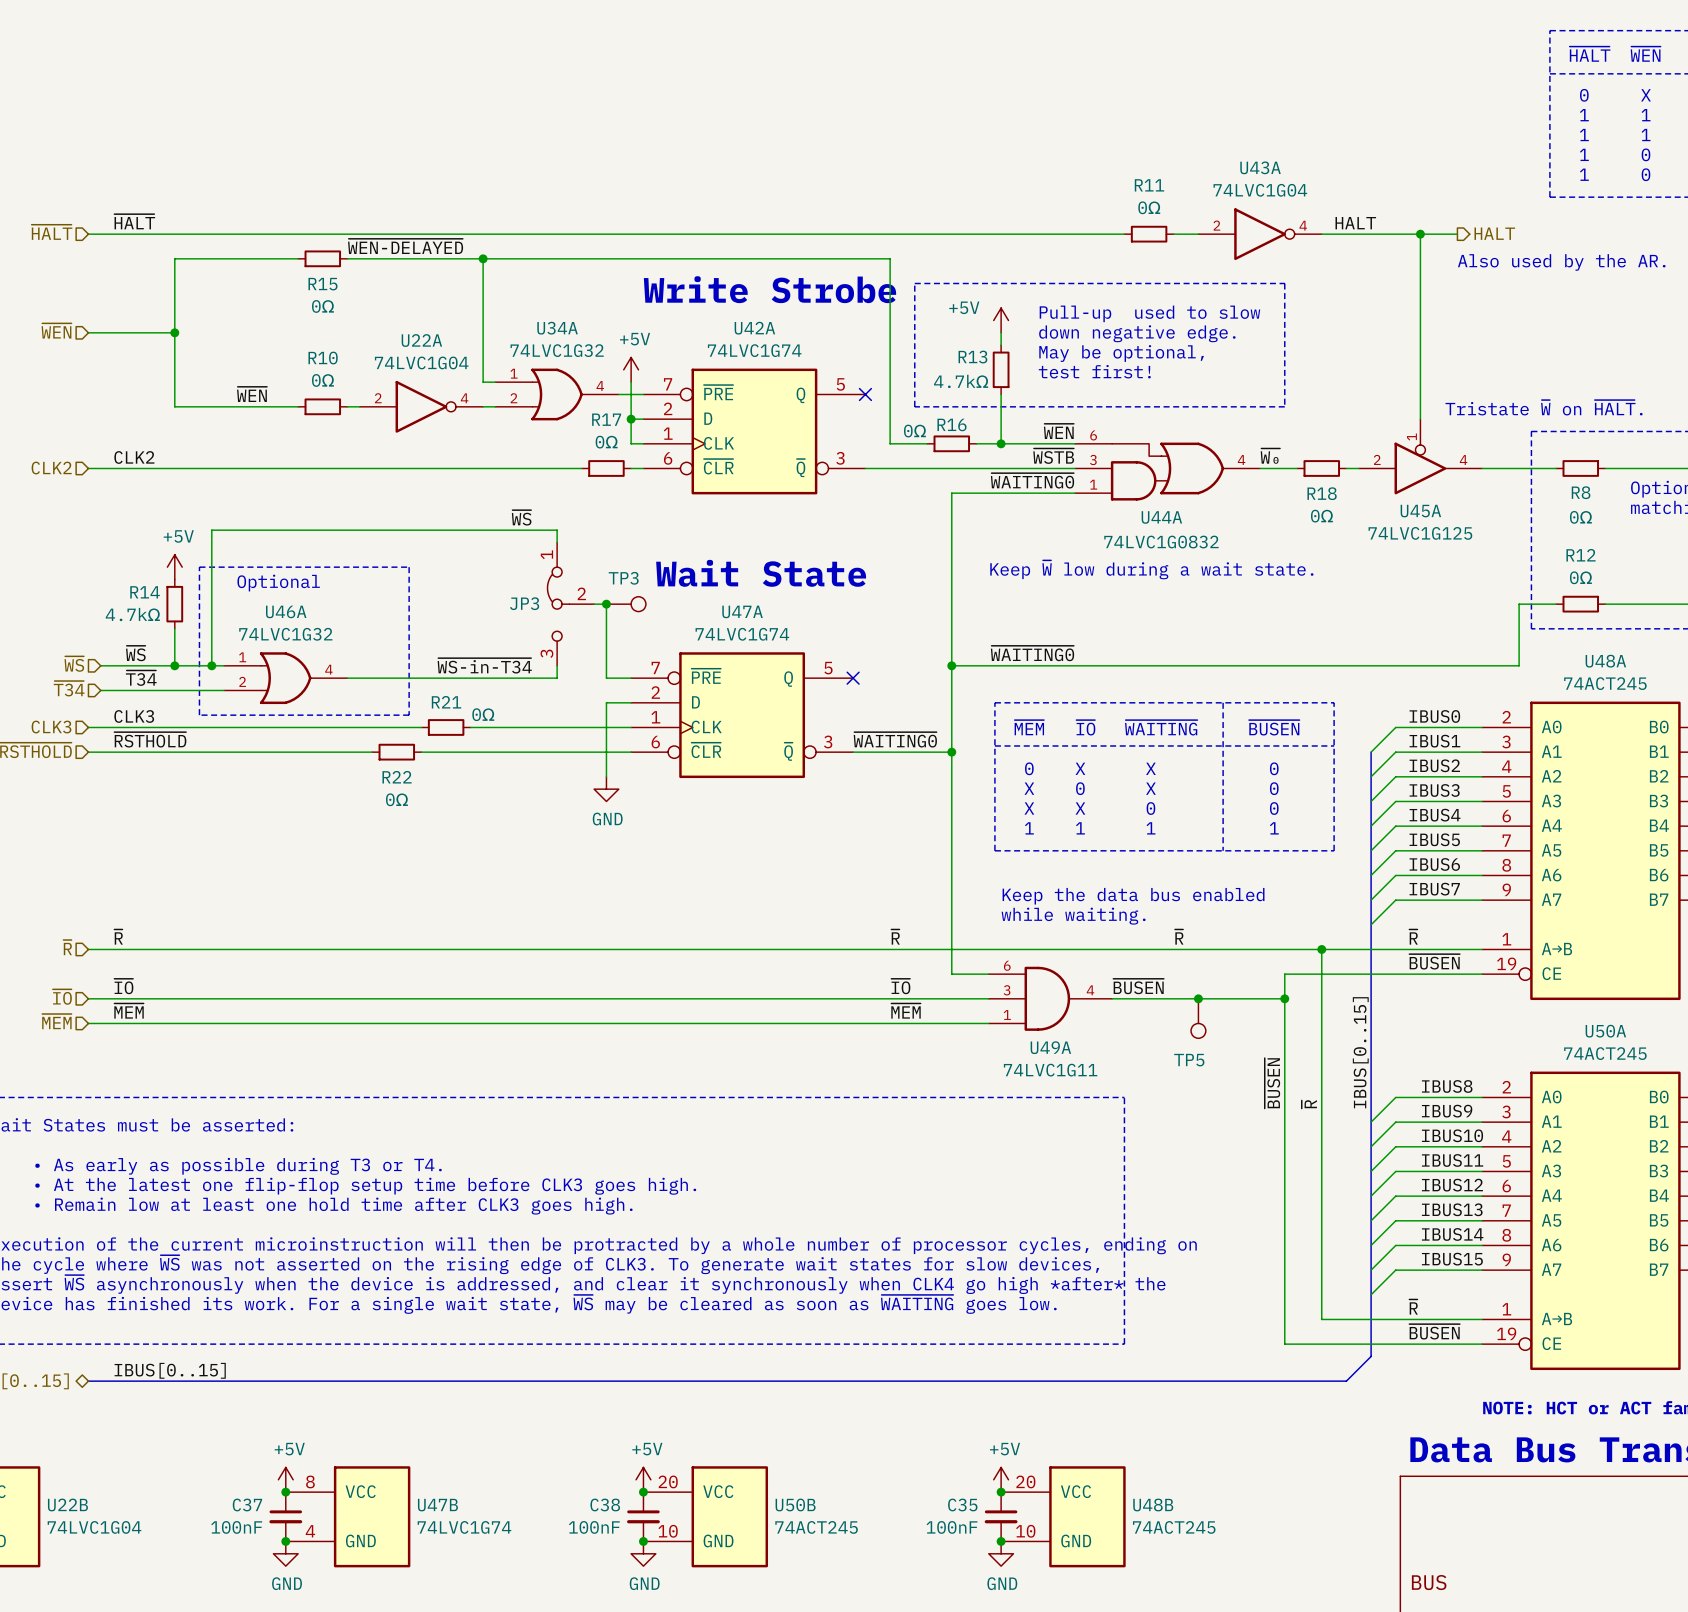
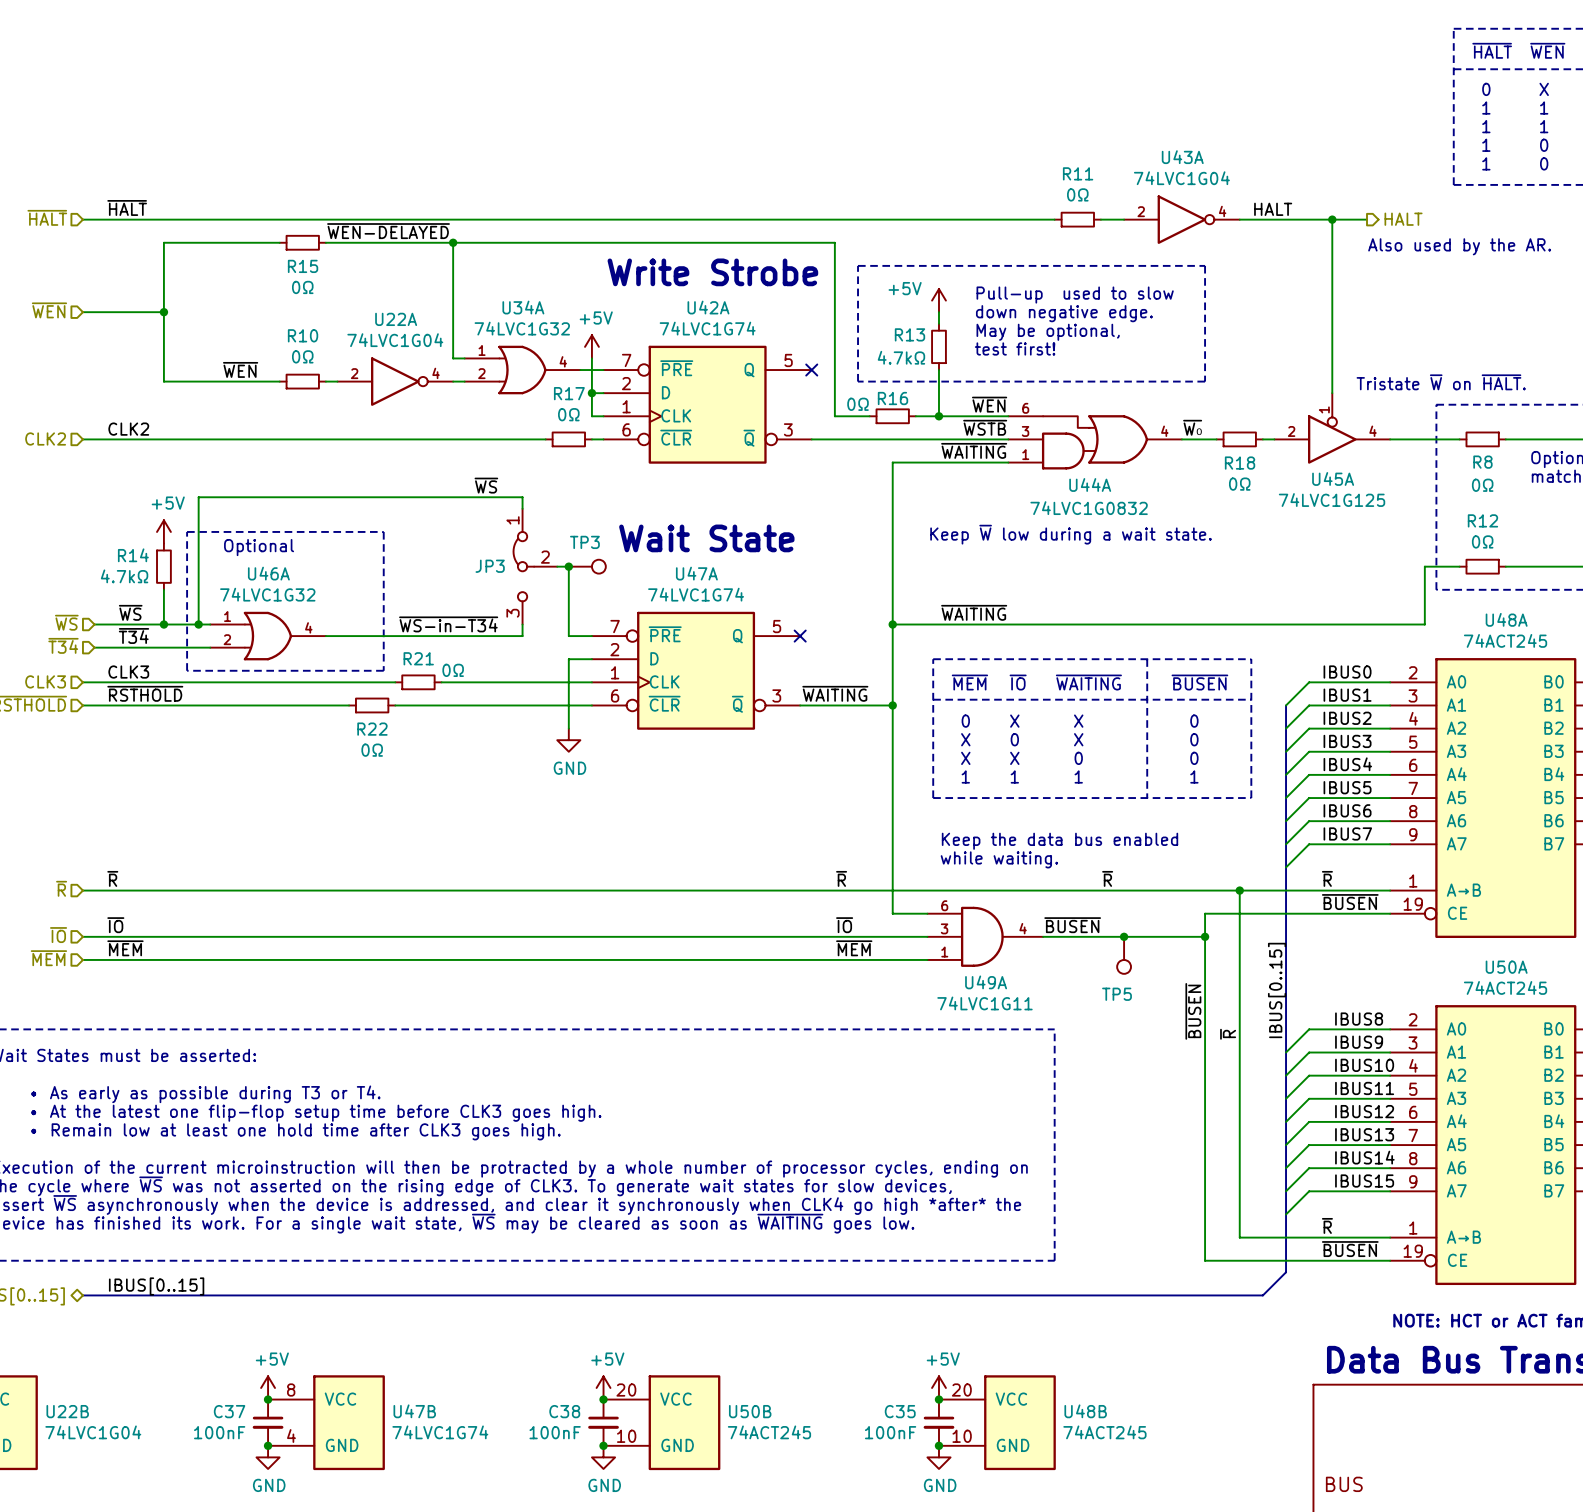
label: ~{WAITING0} (1032, 480) -> ~{WAITING} (974, 450)
label: ~{WAITING0} (1032, 653) -> ~{WAITING} (974, 612)
label: ~{WAITING0} (895, 739) -> ~{WAITING} (835, 693)

